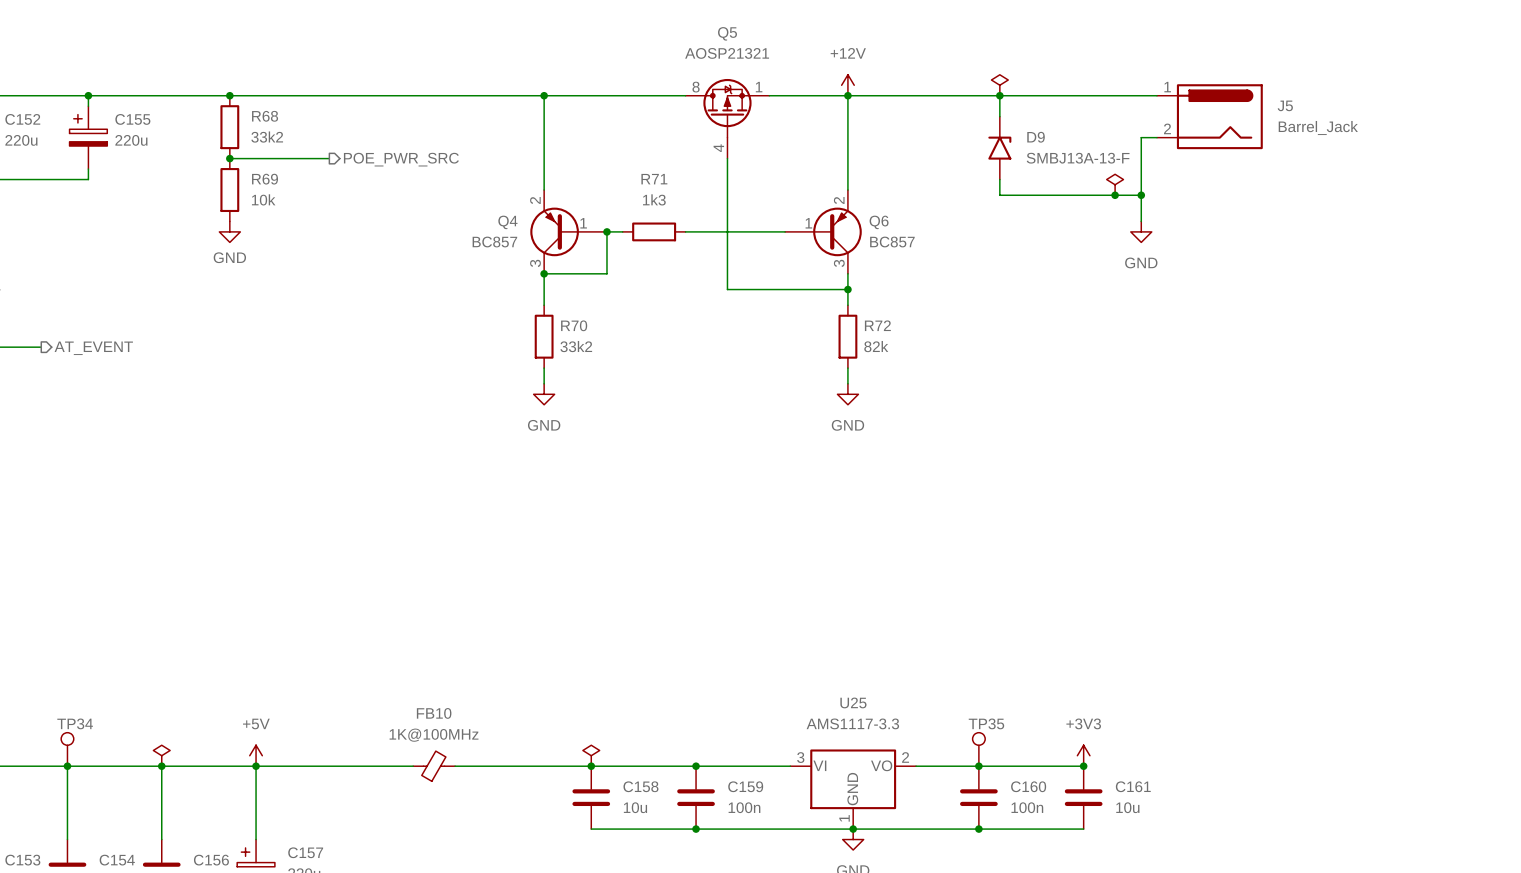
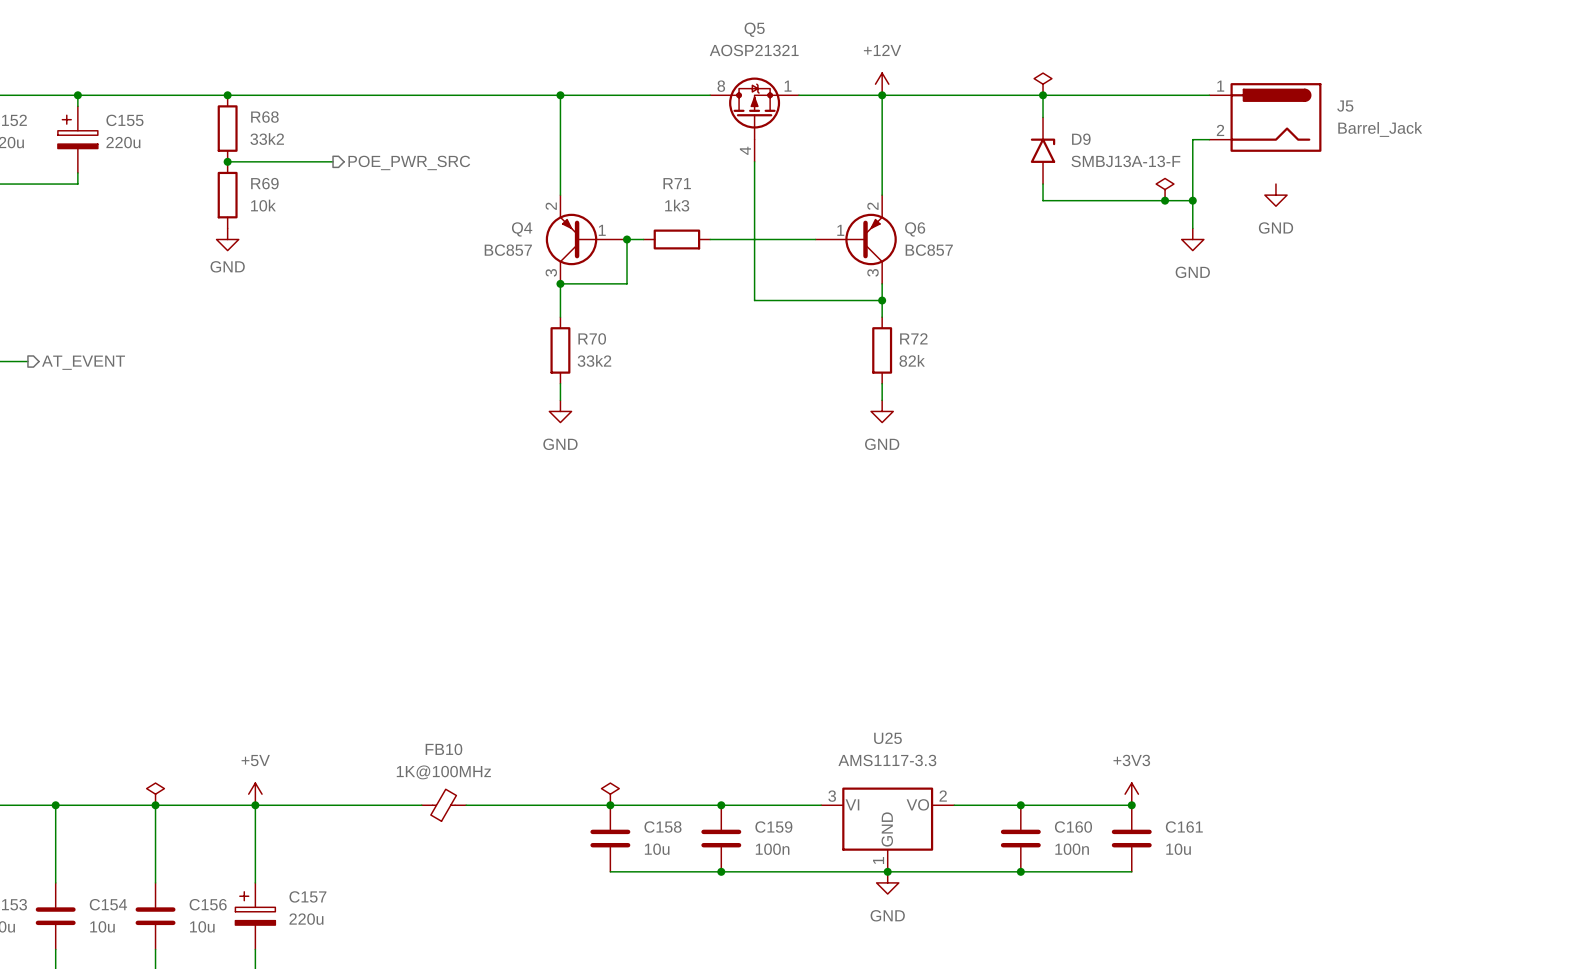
power symbol: none -> GND (1275, 195)
TP34: (67, 749) -> none
TP35: (978, 749) -> none

